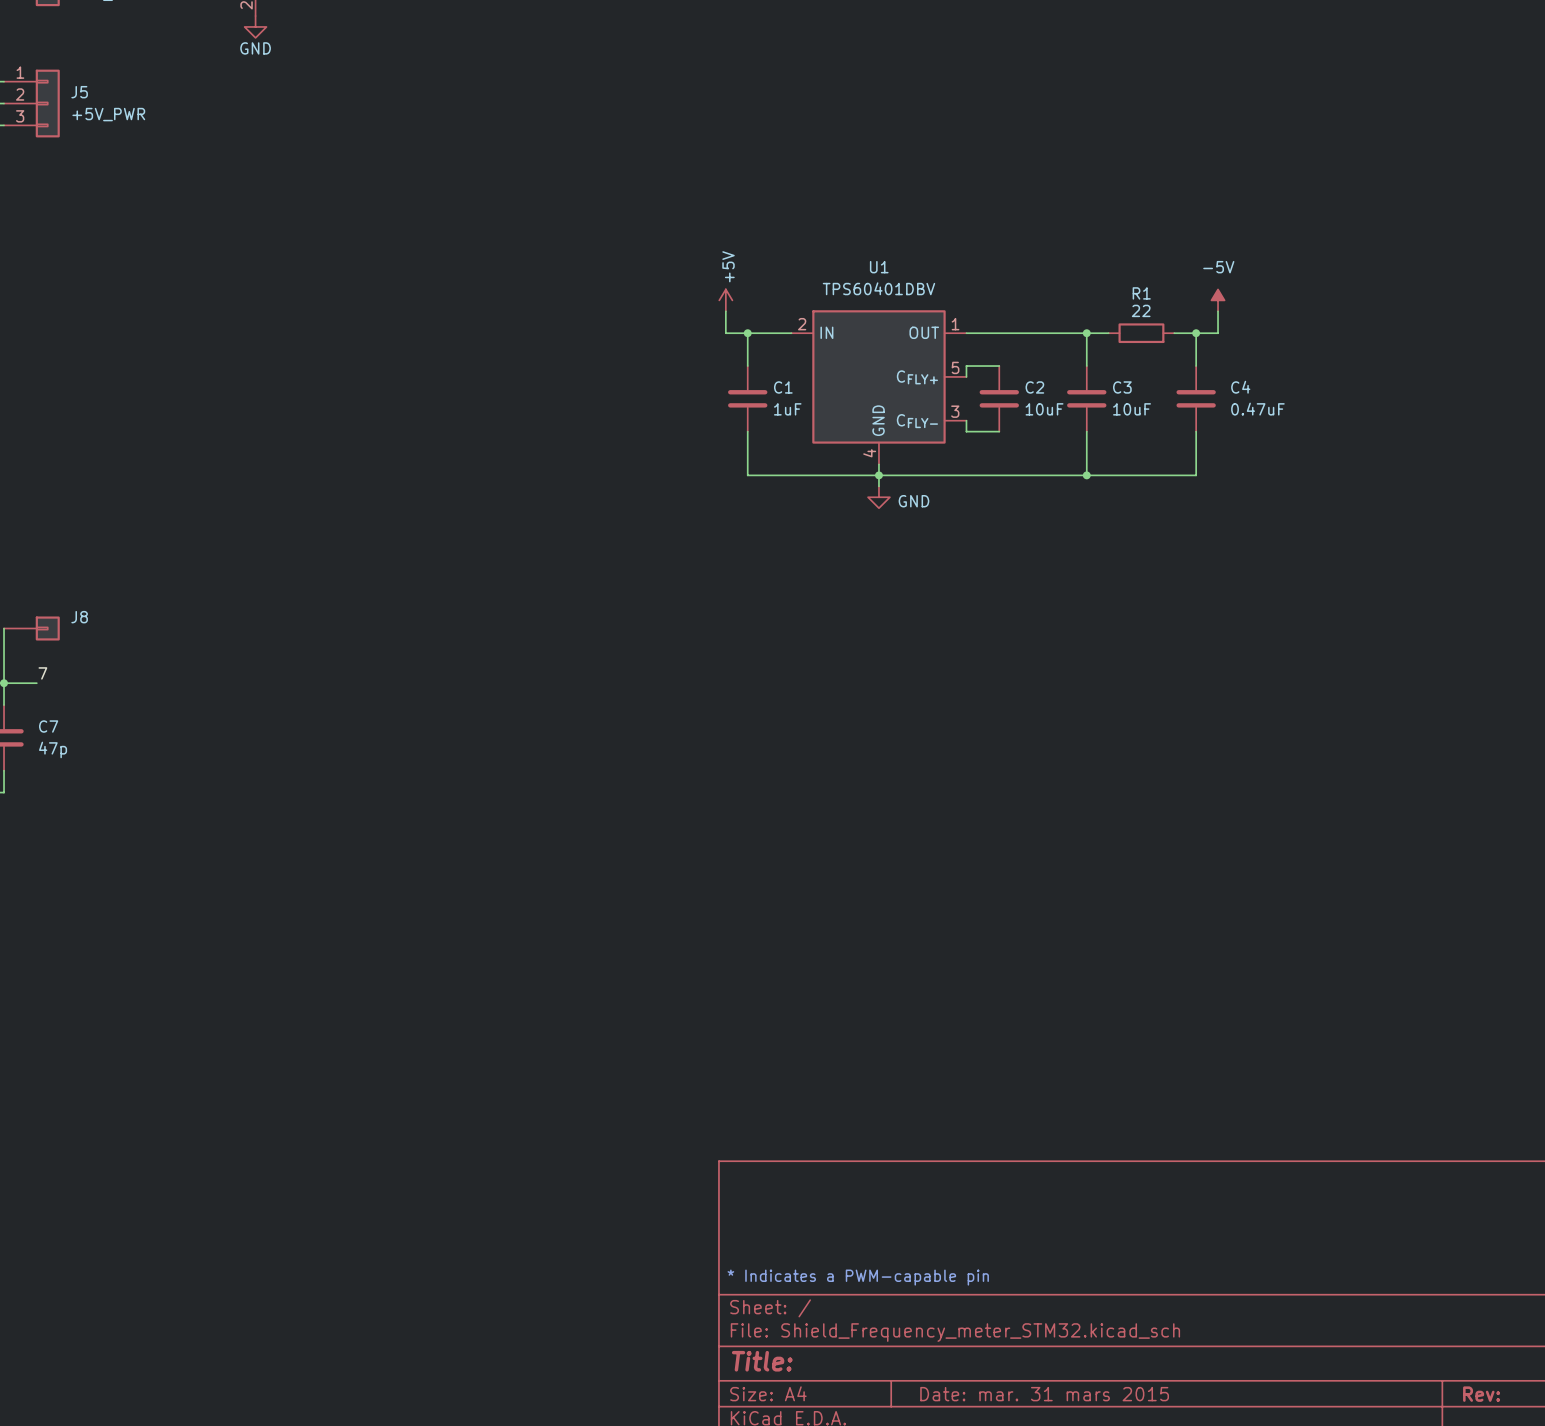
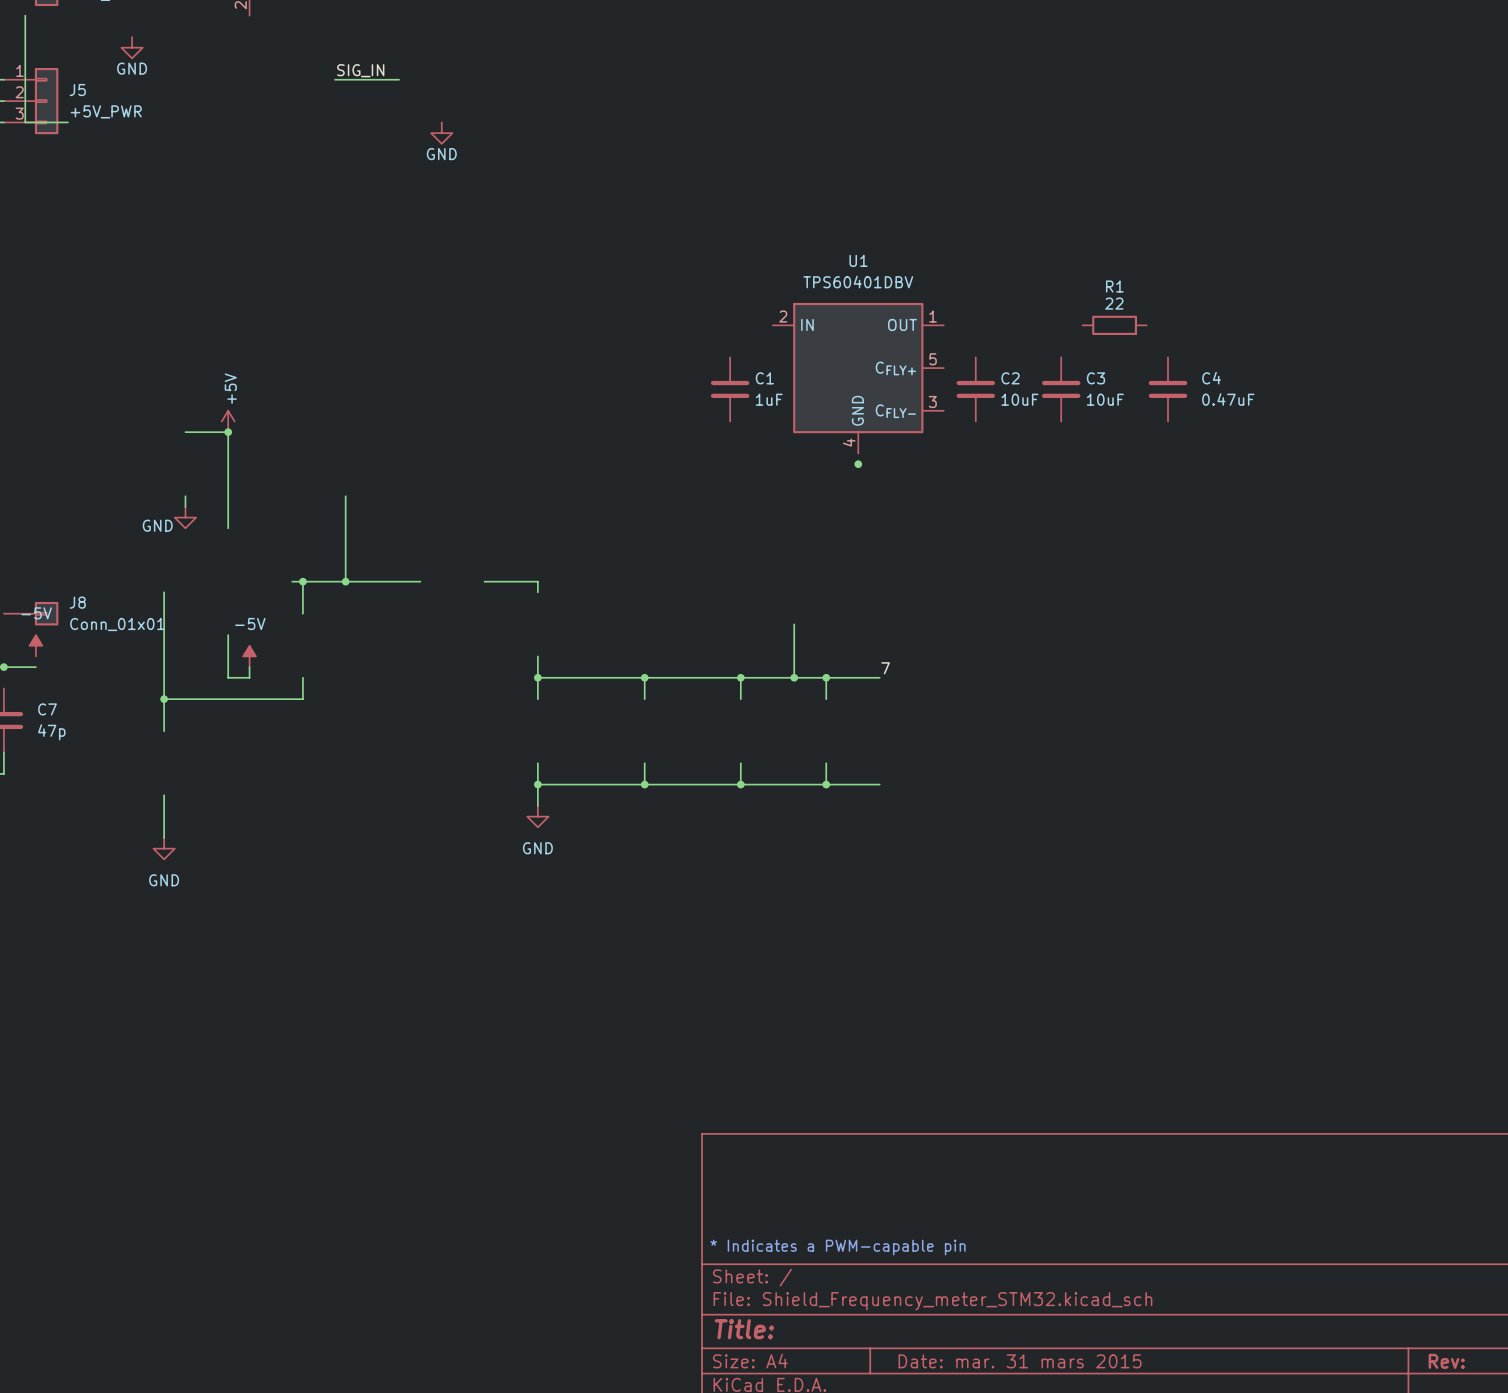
wire: none -> (25, 15) (25, 122) (68, 122)
power symbol: GND (255, 26) -> none
power symbol: none -> GND (132, 47)
label: none -> SIG_IN (360, 70)
wire: none -> (334, 79) (399, 79)
power symbol: none -> GND (441, 133)
power symbol: +5V (725, 300) -> none
power symbol: -5V (1218, 300) -> none
wire: (725, 311) (725, 333) (791, 333) -> none
wire: (1218, 311) (1218, 333) (1174, 333) -> none
wire: (747, 333) (747, 366) -> none
junction: (747, 333) -> none
wire: (966, 333) (1108, 333) -> none
wire: (1086, 333) (1086, 366) -> none
junction: (1086, 333) -> none
wire: (1196, 333) (1196, 366) -> none
junction: (1196, 333) -> none
wire: (999, 366) (966, 366) (966, 376) -> none
wire: (966, 420) (966, 431) (999, 431) -> none
power symbol: none -> +5V (228, 421)
wire: (747, 431) (747, 475) (1196, 475) (1196, 431) -> none
wire: (1086, 431) (1086, 475) -> none
wire: none -> (185, 432) (228, 432) (228, 528)
junction: none -> (228, 432)
wire: (878, 464) (878, 486) -> none
junction: (1086, 475) -> none
power symbol: GND (878, 497) -> none
wire: none -> (185, 496) (185, 506)
wire: none -> (345, 496) (345, 581)
power symbol: none -> GND (185, 517)
wire: none -> (292, 581) (420, 581)
wire: none -> (302, 581) (302, 613)
junction: none -> (302, 581)
junction: none -> (345, 581)
wire: none -> (484, 581) (537, 581) (537, 592)
wire: none -> (164, 592) (164, 731)
wire: (4, 628) (4, 705) -> none
J8 value: none -> Conn_01x01 (117, 624)
wire: none -> (794, 624) (794, 677)
wire: none -> (228, 635) (228, 677) (249, 677) (249, 667)
power symbol: none -> -5V (35, 645)
power symbol: none -> -5V (249, 656)
wire: none -> (537, 656) (537, 699)
label: 7 (42, 673) -> none
label: none -> 7 (885, 668)
wire: none -> (302, 677) (302, 699) (164, 699)
wire: none -> (537, 677) (879, 677)
junction: none -> (537, 677)
wire: none -> (644, 677) (644, 699)
junction: none -> (644, 677)
wire: none -> (740, 677) (740, 699)
junction: none -> (740, 677)
junction: none -> (794, 677)
wire: none -> (826, 677) (826, 699)
junction: none -> (826, 677)
junction: none -> (164, 699)
wire: none -> (537, 763) (537, 805)
wire: none -> (644, 763) (644, 784)
wire: none -> (740, 763) (740, 784)
wire: none -> (826, 763) (826, 784)
wire: none -> (537, 784) (879, 784)
junction: none -> (537, 784)
junction: none -> (644, 784)
junction: none -> (740, 784)
junction: none -> (826, 784)
wire: none -> (164, 795) (164, 837)
power symbol: none -> GND (537, 816)
power symbol: none -> GND (164, 848)

